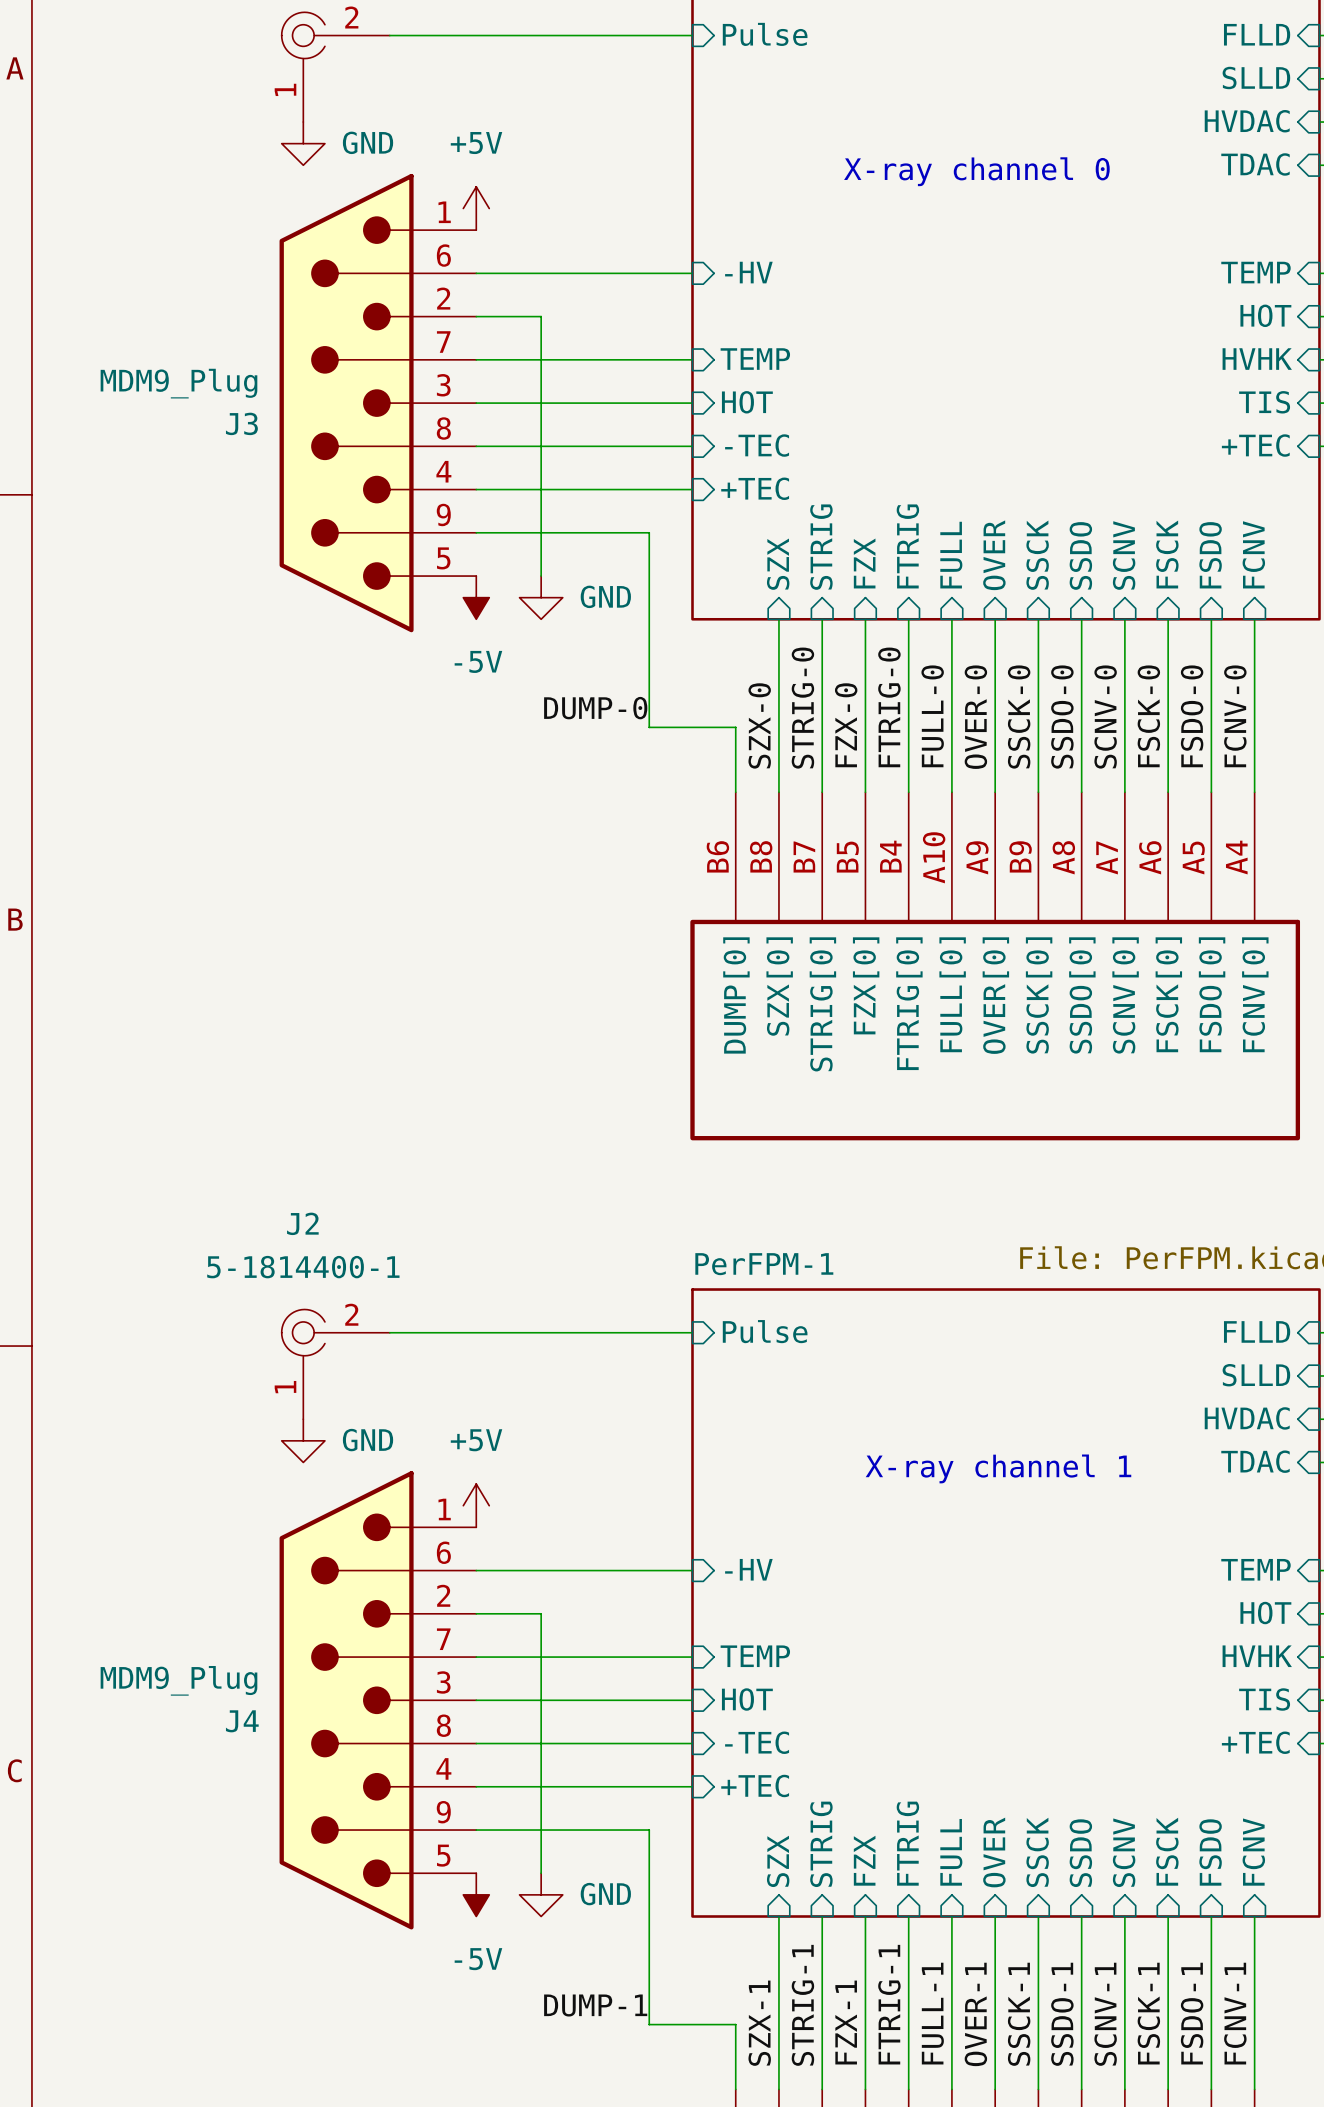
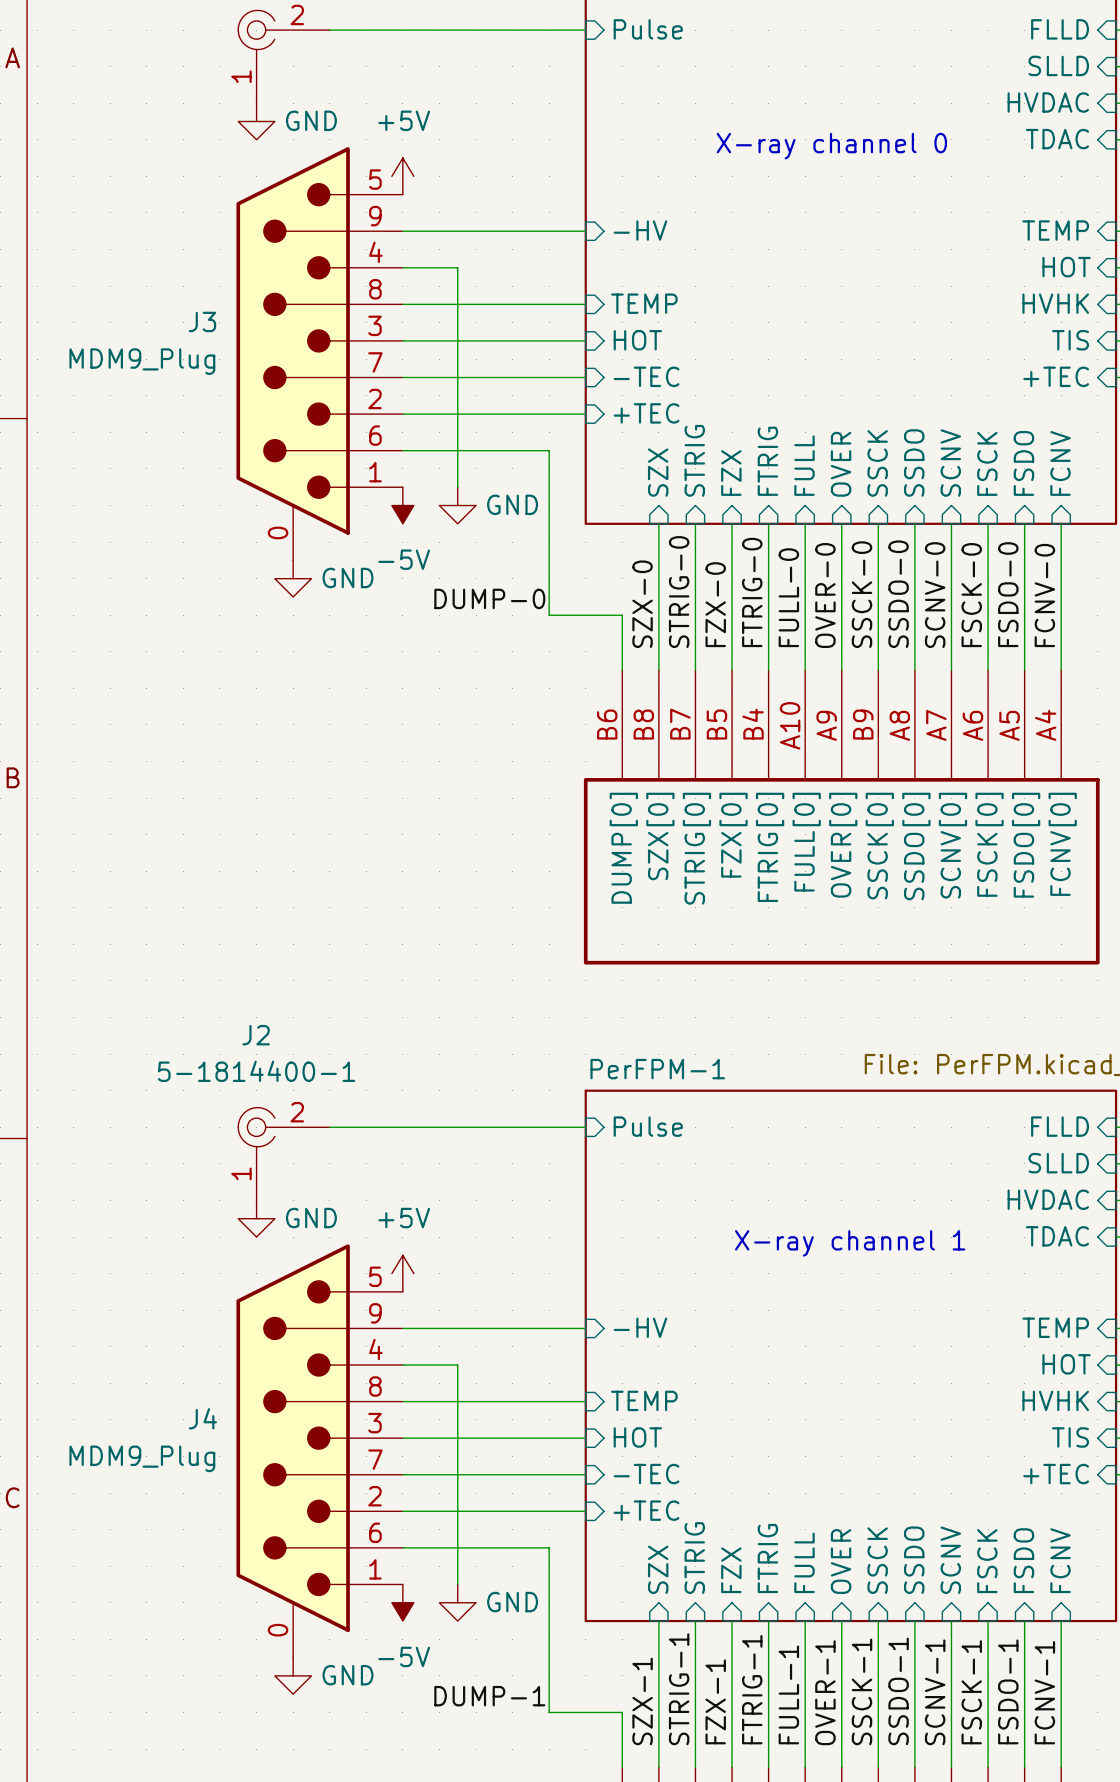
J3 symbol: [279, 173, 477, 633] -> [236, 147, 403, 561]
J3 name position: J3 (241, 423) -> J3 (202, 321)
power symbol: none -> GND (293, 578)
J4 symbol: [279, 1471, 477, 1930] -> [236, 1244, 403, 1658]
J4 name position: J4 (242, 1721) -> J4 (202, 1418)
power symbol: none -> GND (293, 1675)

